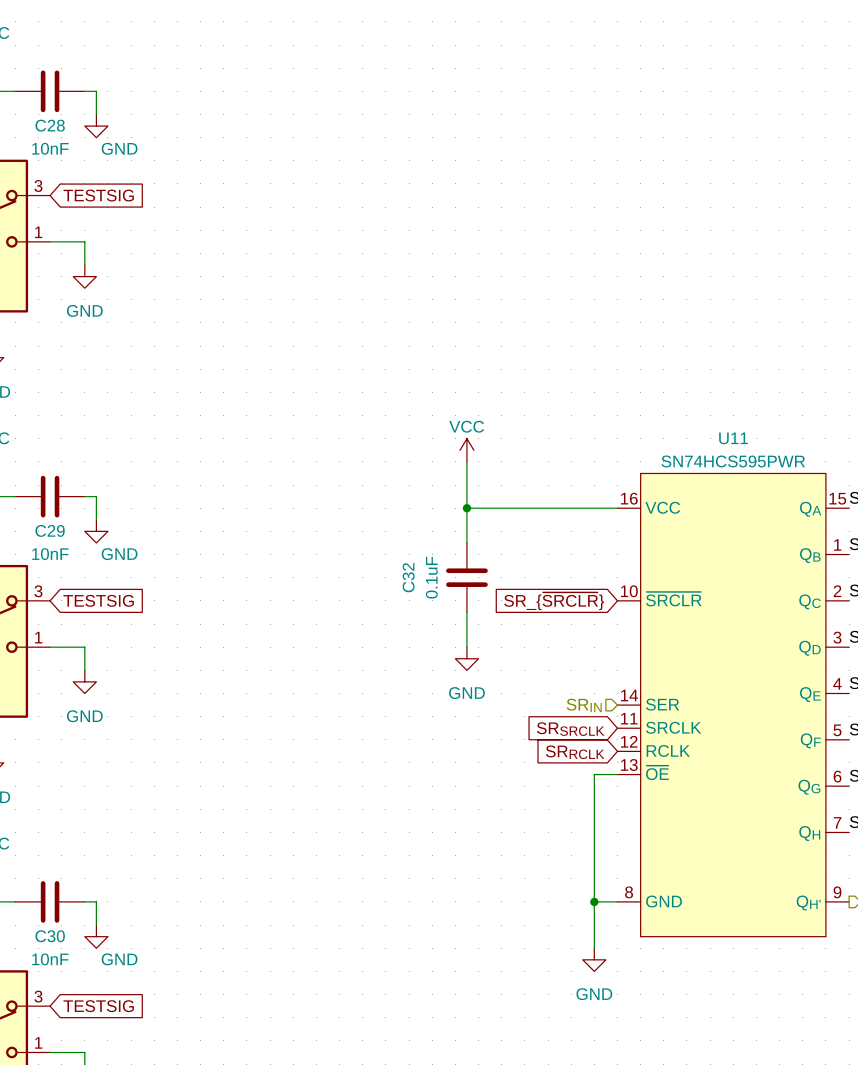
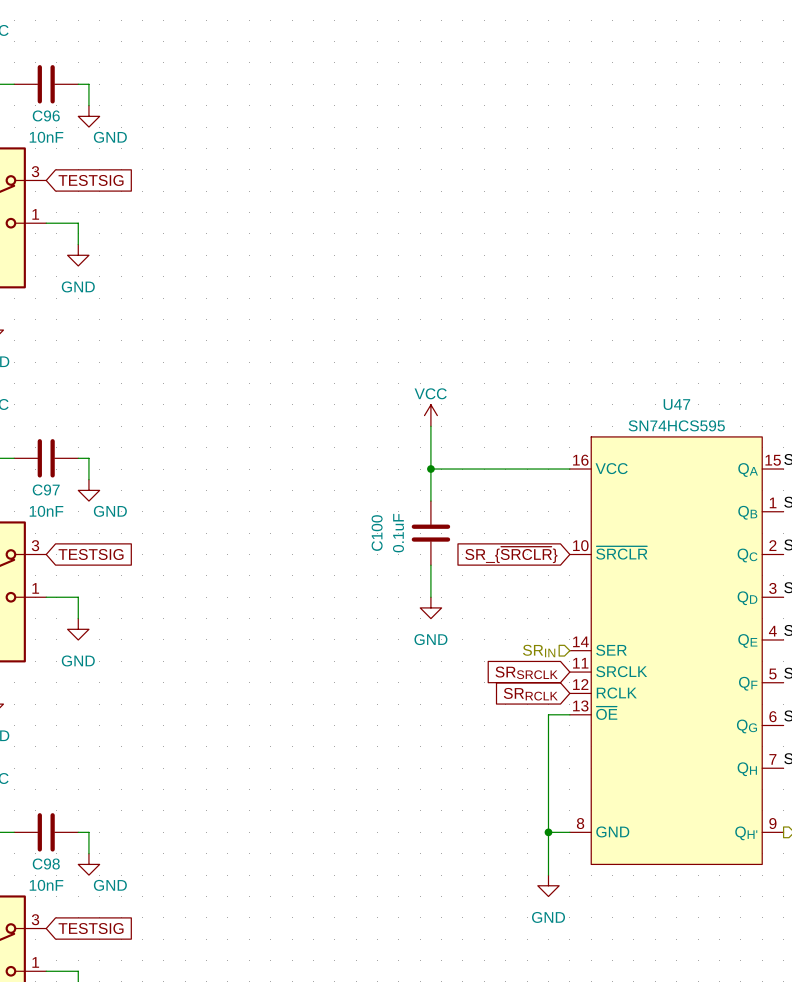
C28 name: C28 (50, 125) -> C96 (46, 115)
U11 name: U11 (733, 438) -> U47 (676, 404)
U11 value: SN74HCS595PWR (733, 461) -> SN74HCS595 (676, 425)
C29 name: C29 (50, 530) -> C97 (46, 489)
C32 name: C32 (408, 577) -> C100 (377, 533)
C30 name: C30 (50, 936) -> C98 (46, 864)

